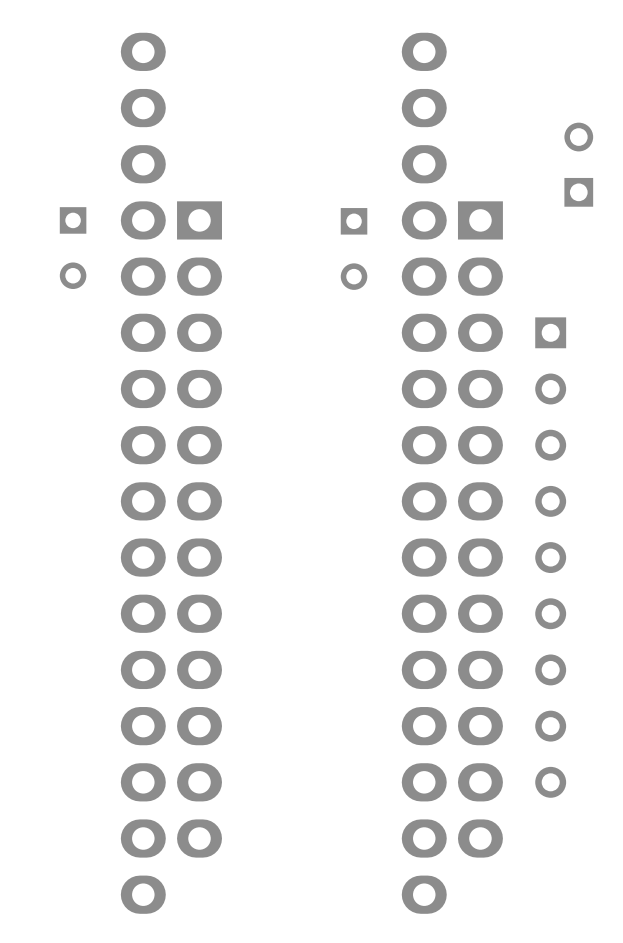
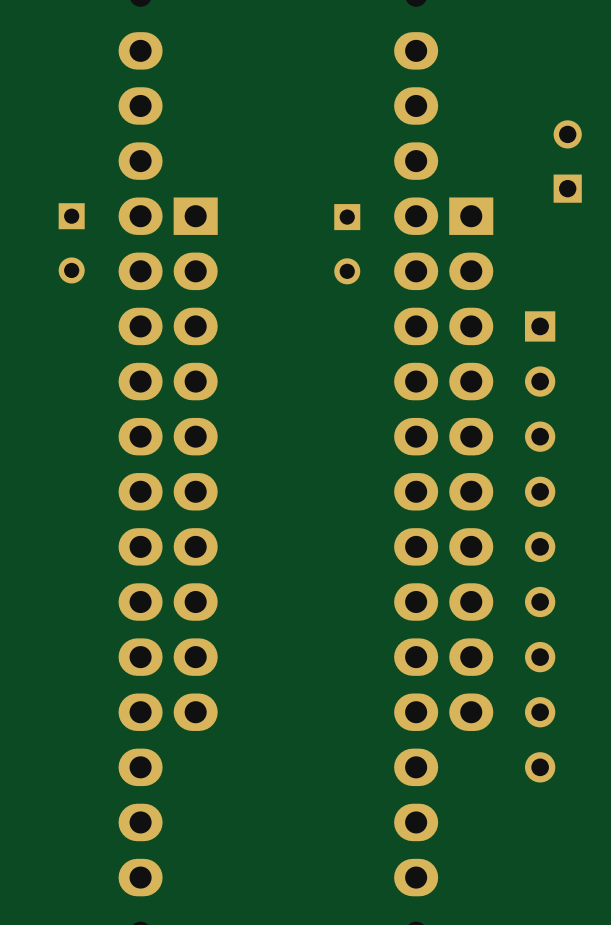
part: (199, 529) -> none
part: (480, 529) -> none

